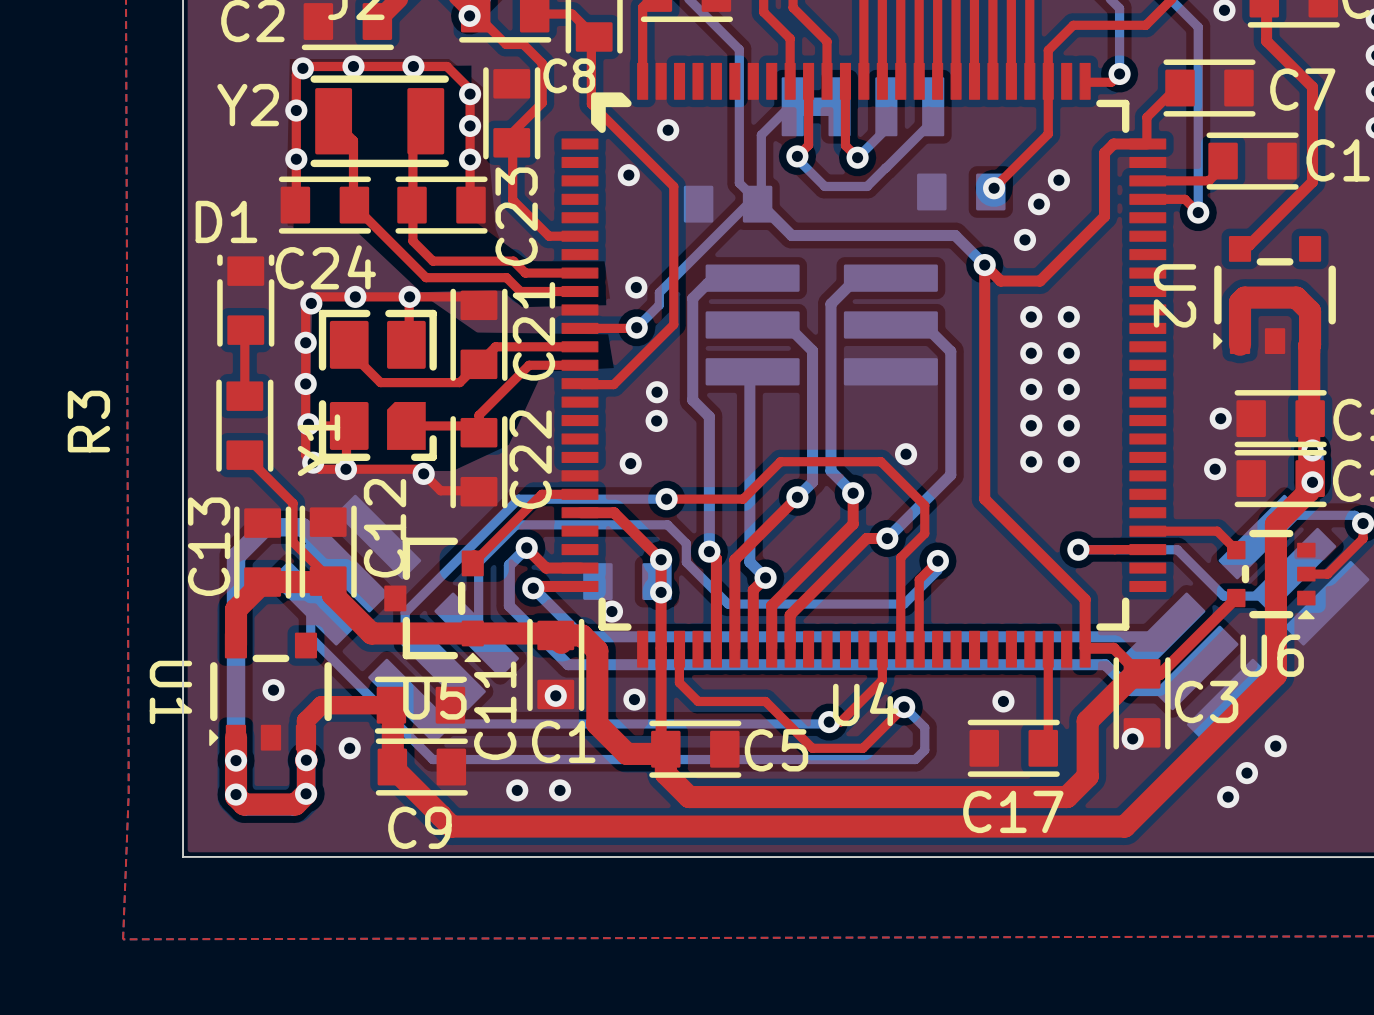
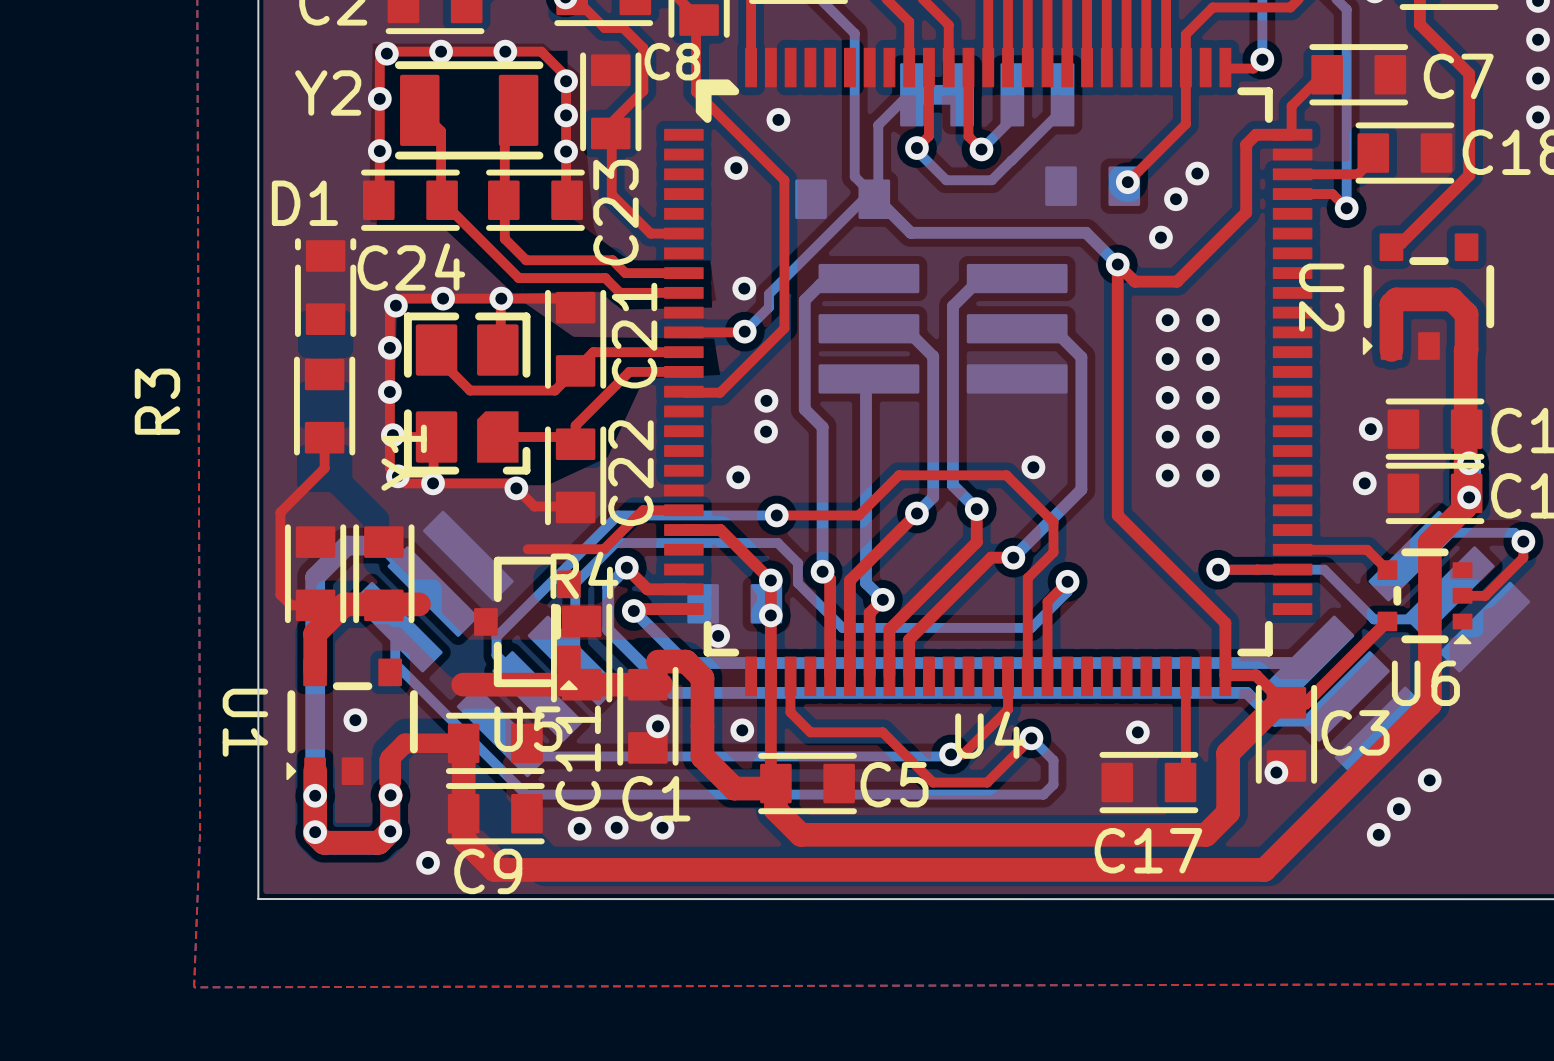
D1 position: (245, 300) -> (325, 287)
top track: (244, 330) (244, 394) -> none
R3 position: (244, 425) -> (324, 406)
top track: none -> (324, 437) (324, 468) (280, 512) (280, 594) (290, 605) (315, 605)
top track: (244, 455) (293, 503) (293, 542) (332, 582) (332, 594) (371, 633) (551, 633) (561, 642) -> none
top track: (505, 530) (472, 563) -> (604, 549) (527, 549)
C12: (328, 551) -> none
C13: (262, 552) -> none
part: none -> (315, 573)
part: none -> (383, 573)
R4: none -> (581, 653)
top track: none -> (463, 684) (661, 684)
C1 position: (555, 664) -> (647, 716)
C11 position: (420, 705) -> (495, 743)
C11 name position: C11 (495, 710) -> C11 (578, 758)
top track: (305, 725) (305, 720) (321, 705) (391, 705) (392, 767) (451, 826) (1124, 826) -> (390, 758) (404, 743) (463, 743) (463, 839) (494, 869) (1264, 869) (1267, 866)
via: (349, 748) -> none
C9 position: (421, 767) -> (495, 813)
via: none -> (579, 828)
via: none -> (428, 862)
C9 name position: C9 (419, 827) -> C9 (488, 871)

